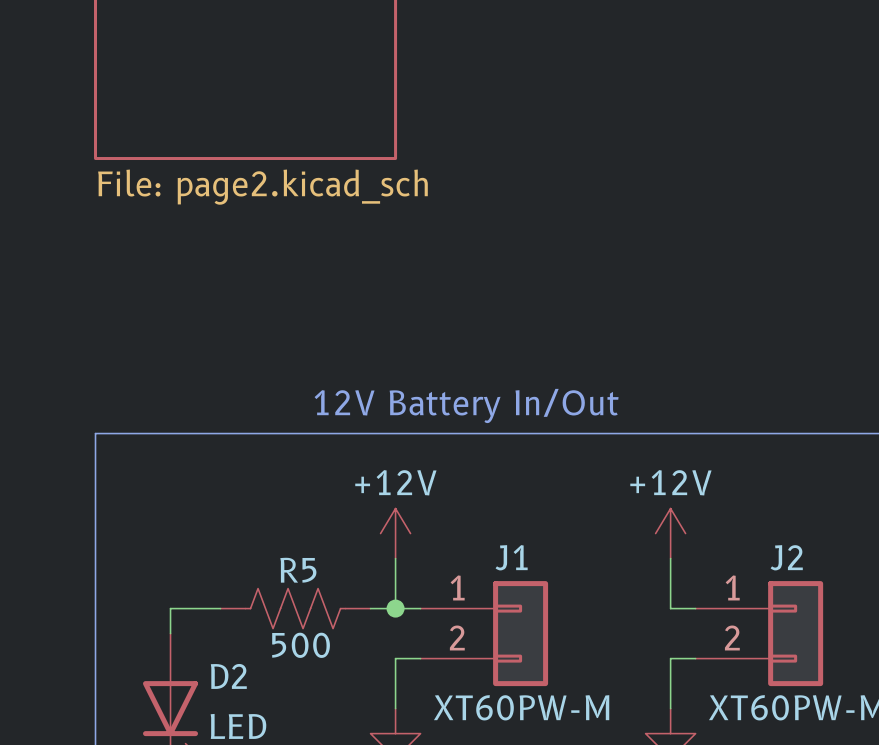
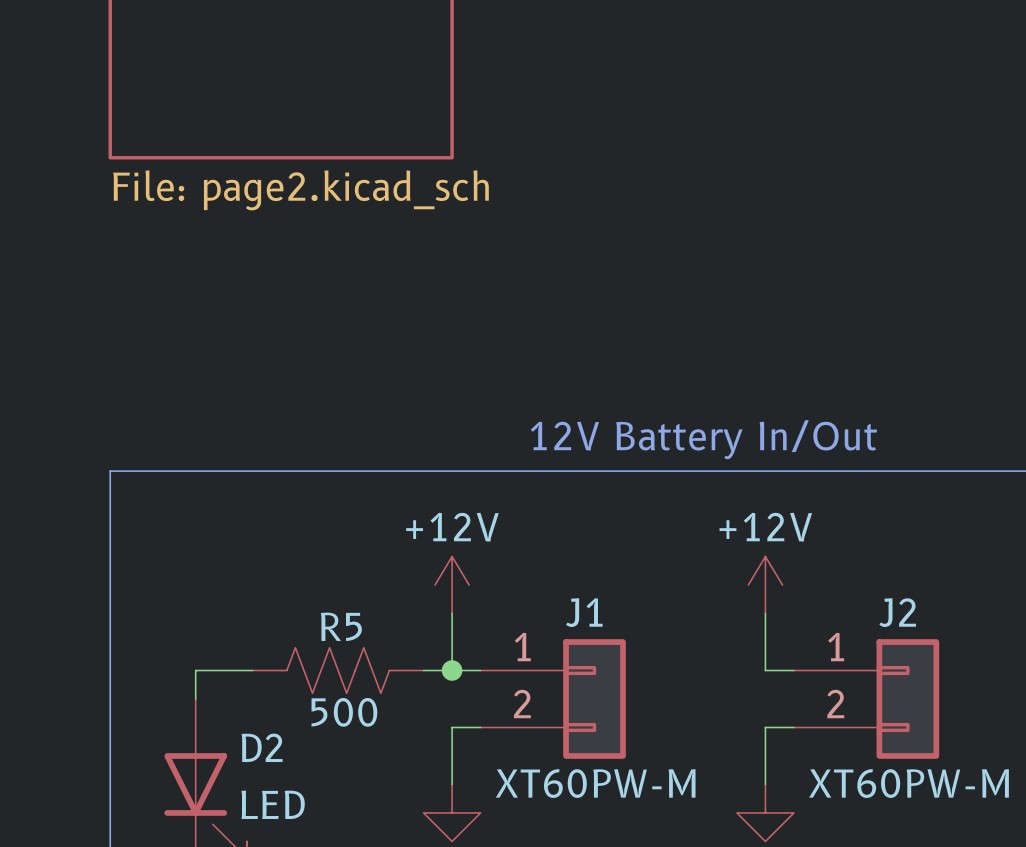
text position: 12V Battery In/Out (466, 405) -> 12V Battery In/Out (703, 439)

